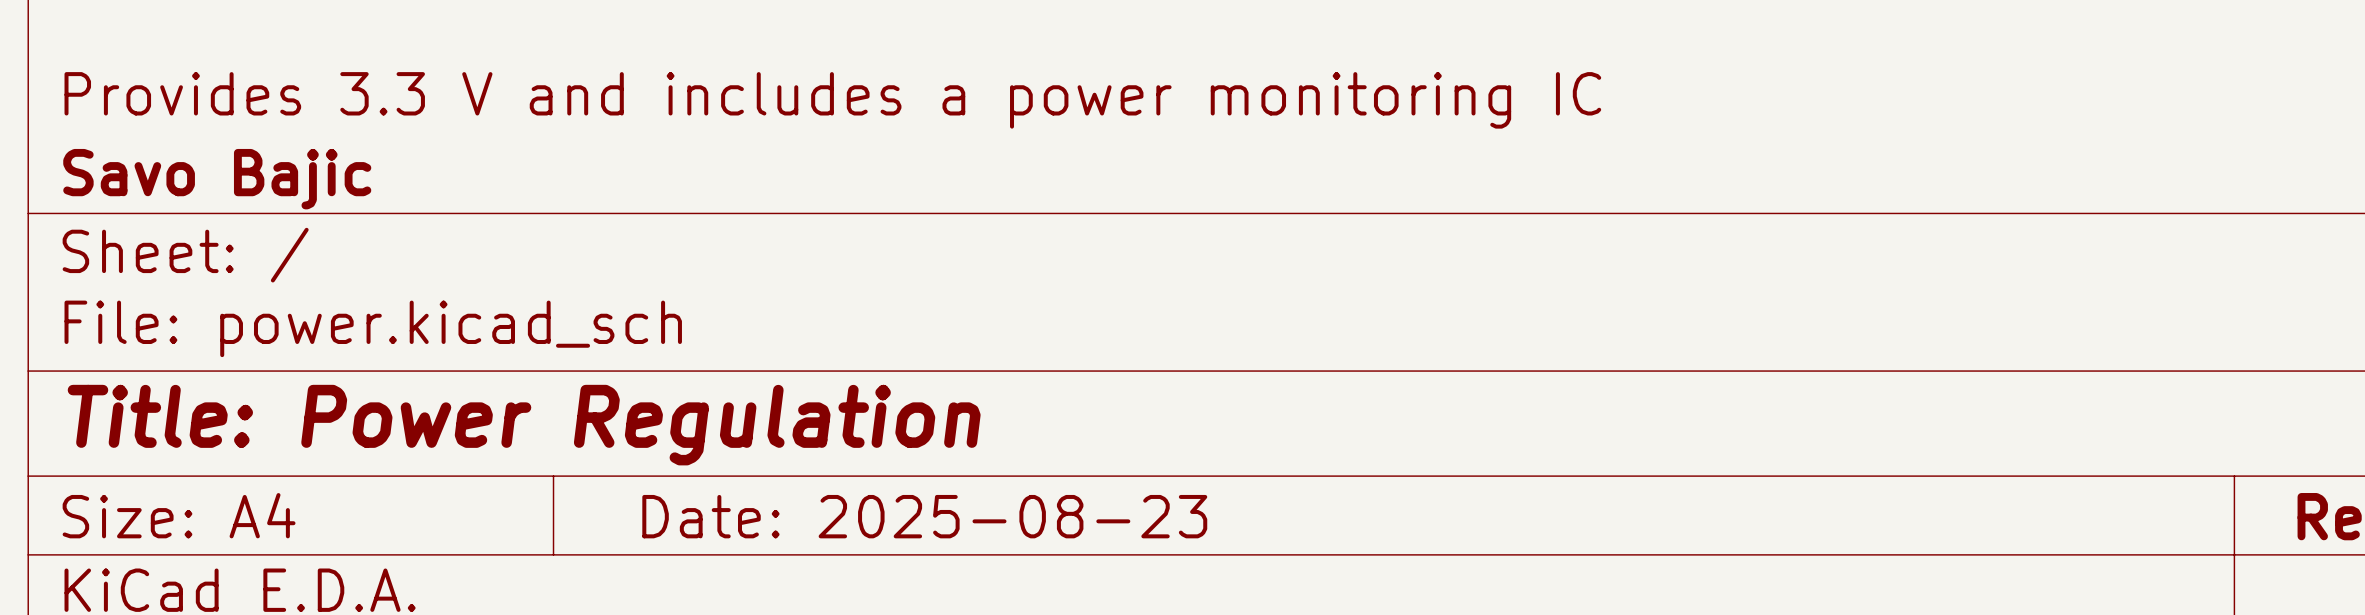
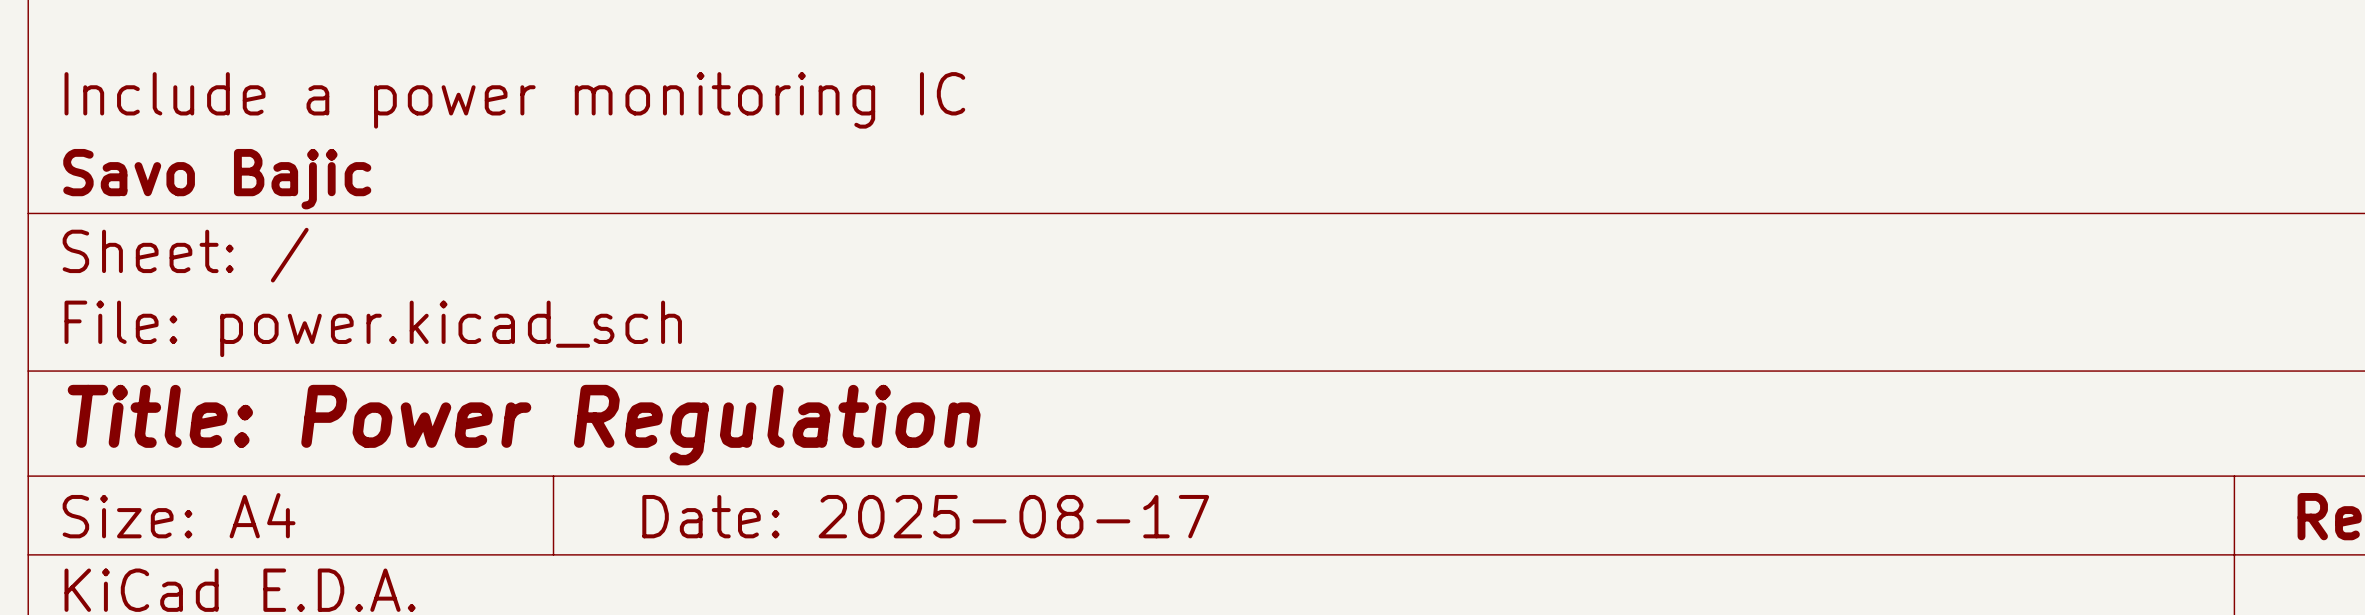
title block: Provides 3.3 V and includes a power monitoring IC (832, 100) -> Include a power monitoring IC (514, 100)
title block: Date: 2025-08-23 (924, 516) -> Date: 2025-08-17 (925, 516)

